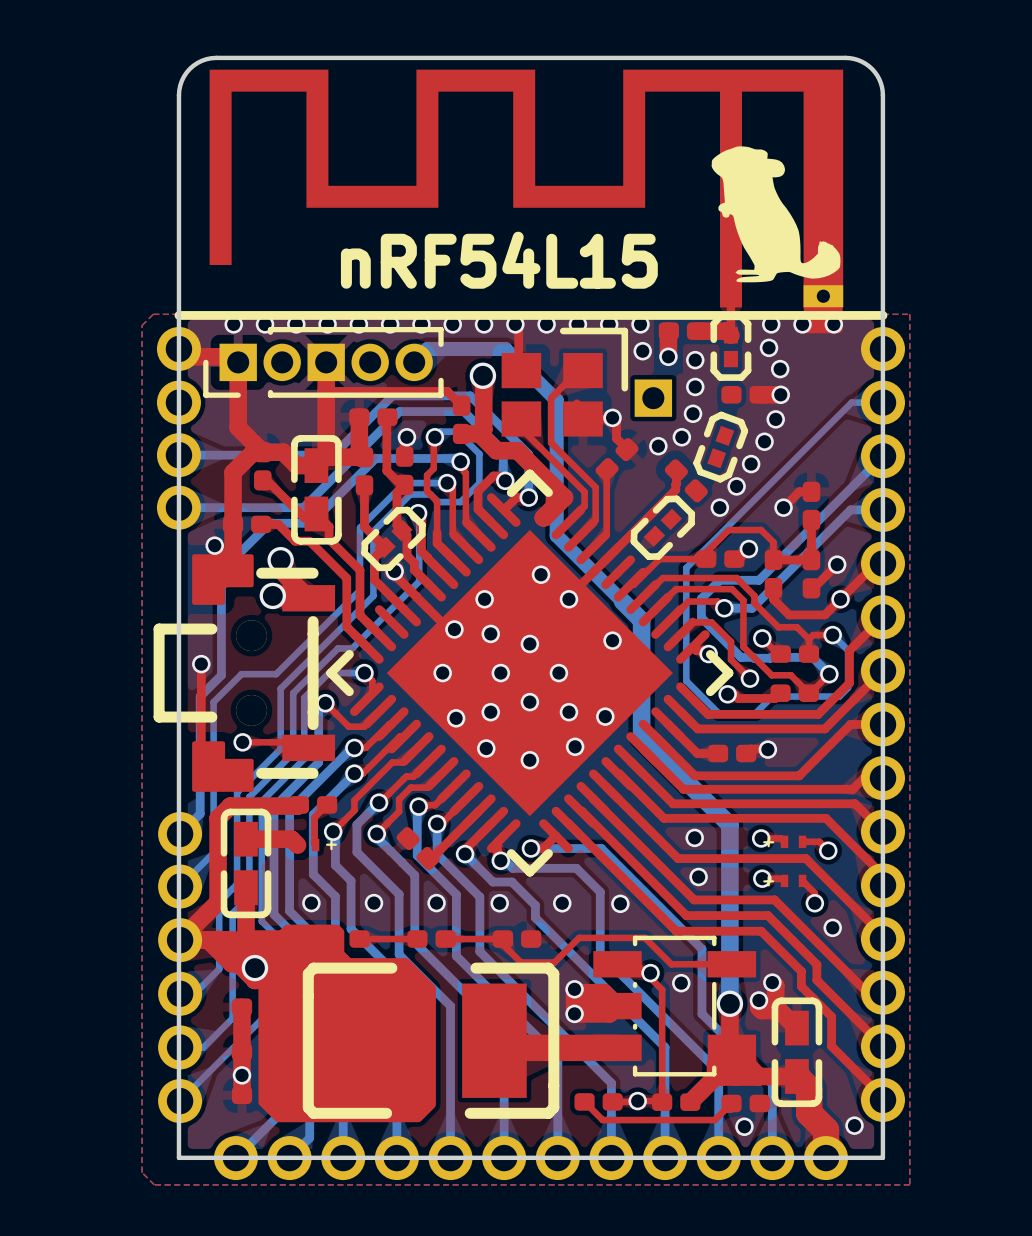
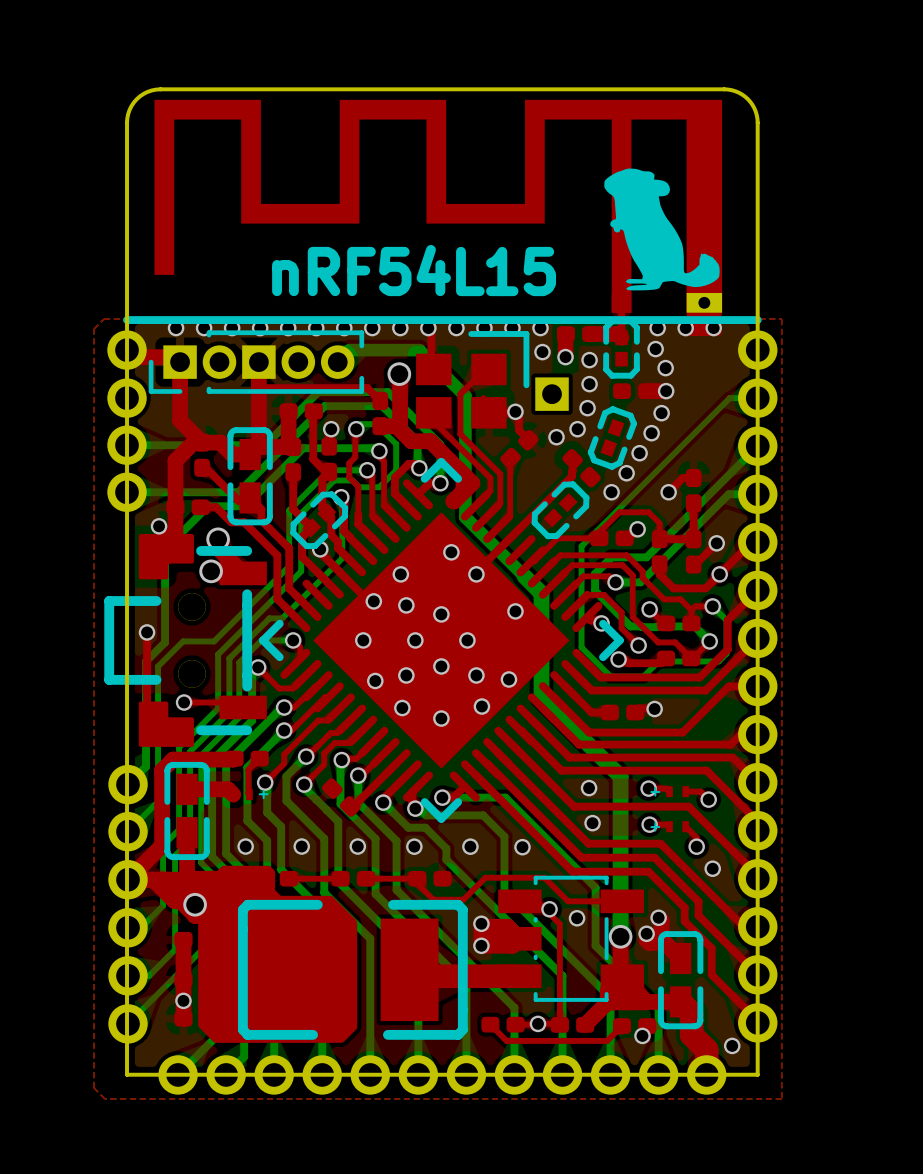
via position: (744, 1126) -> (642, 1035)

